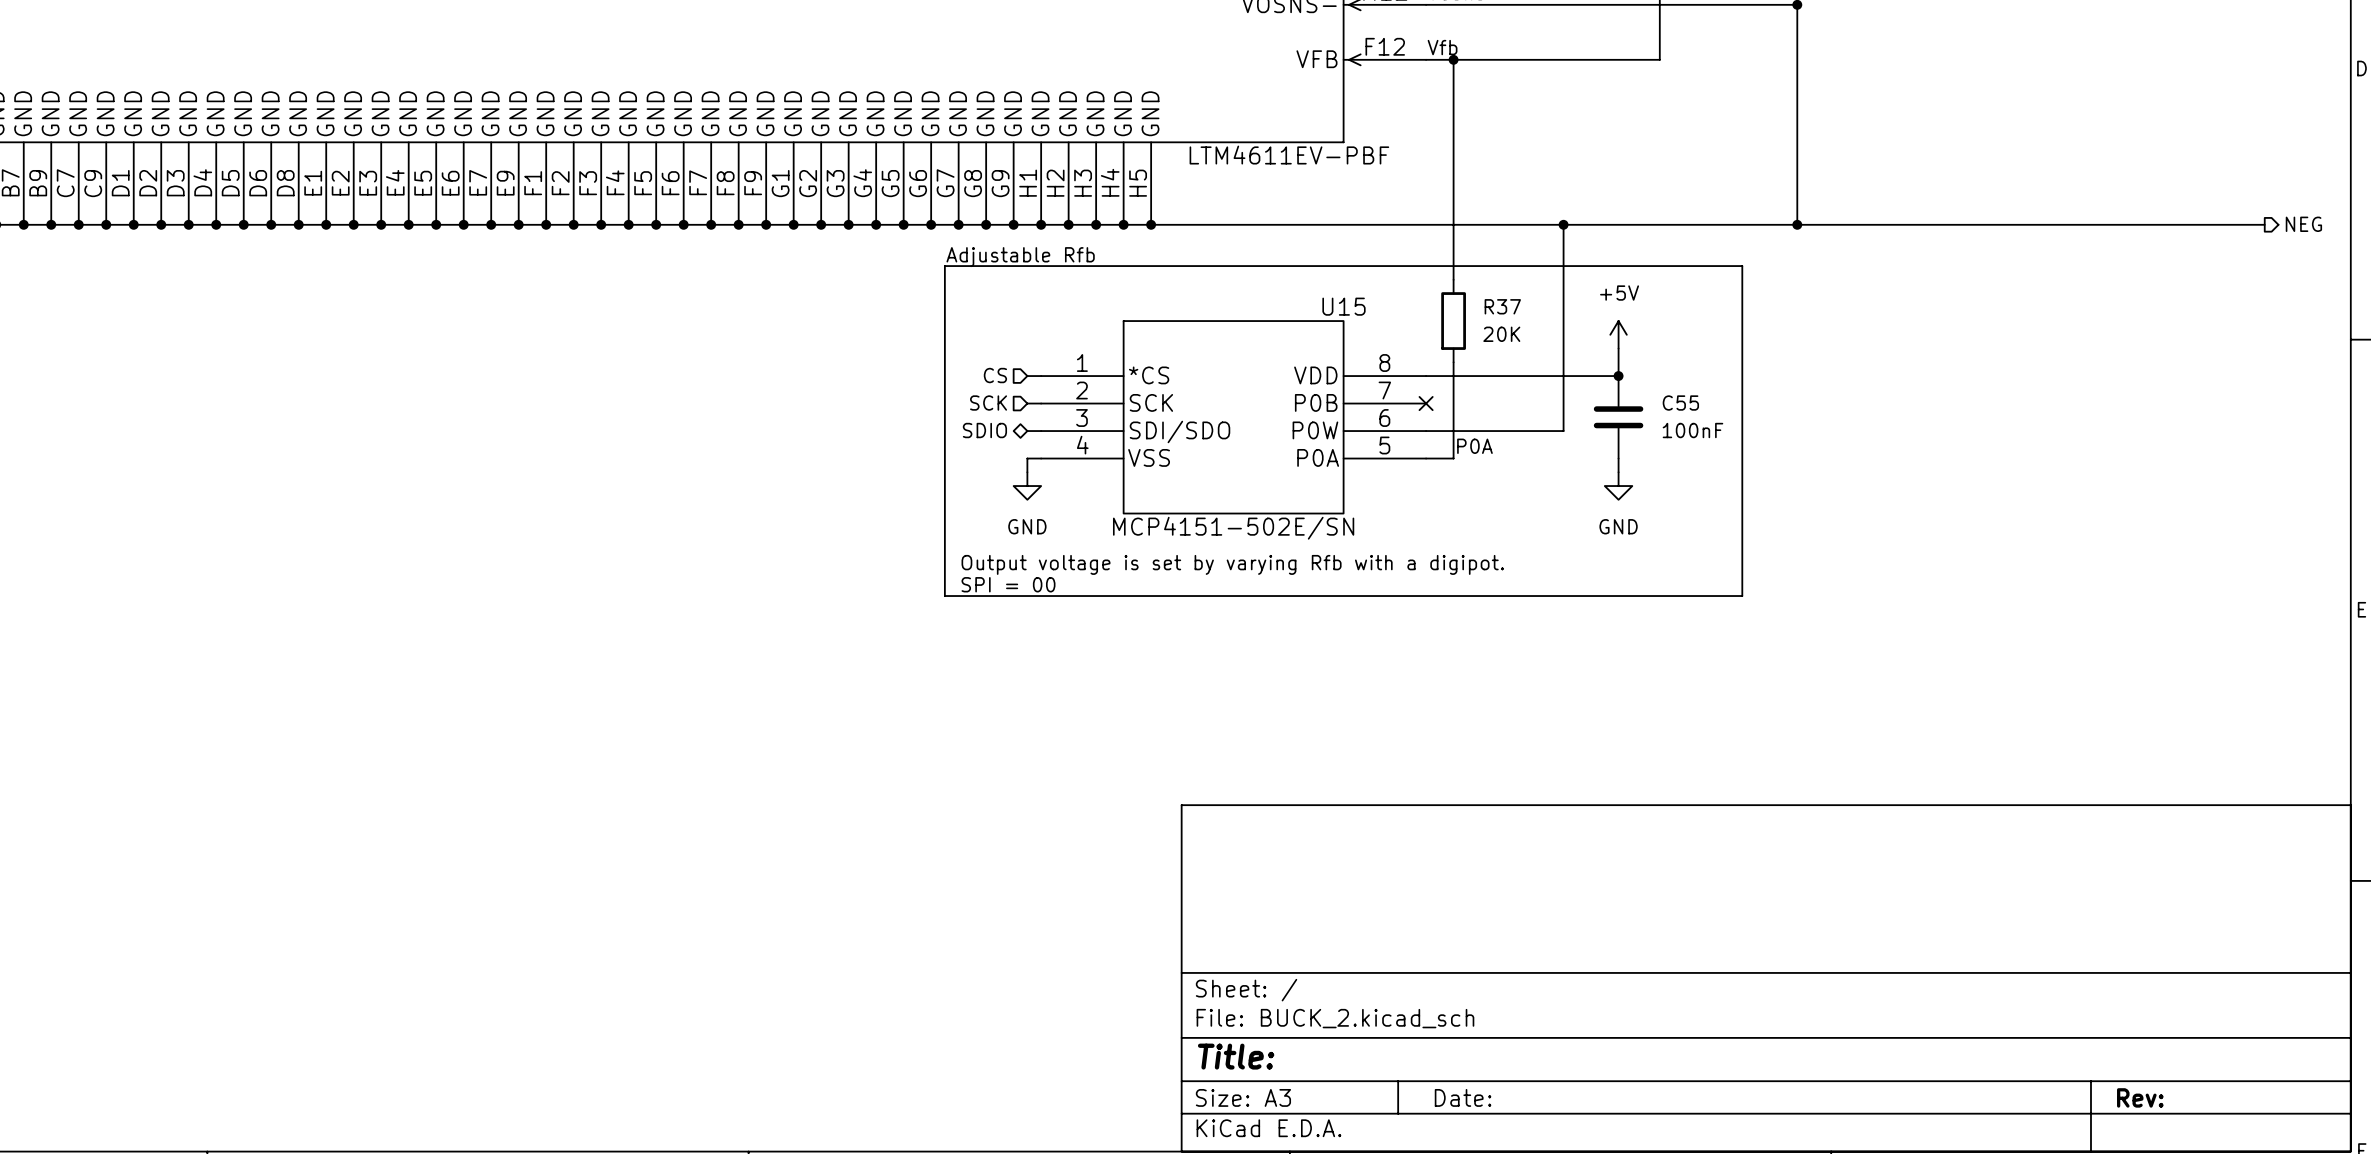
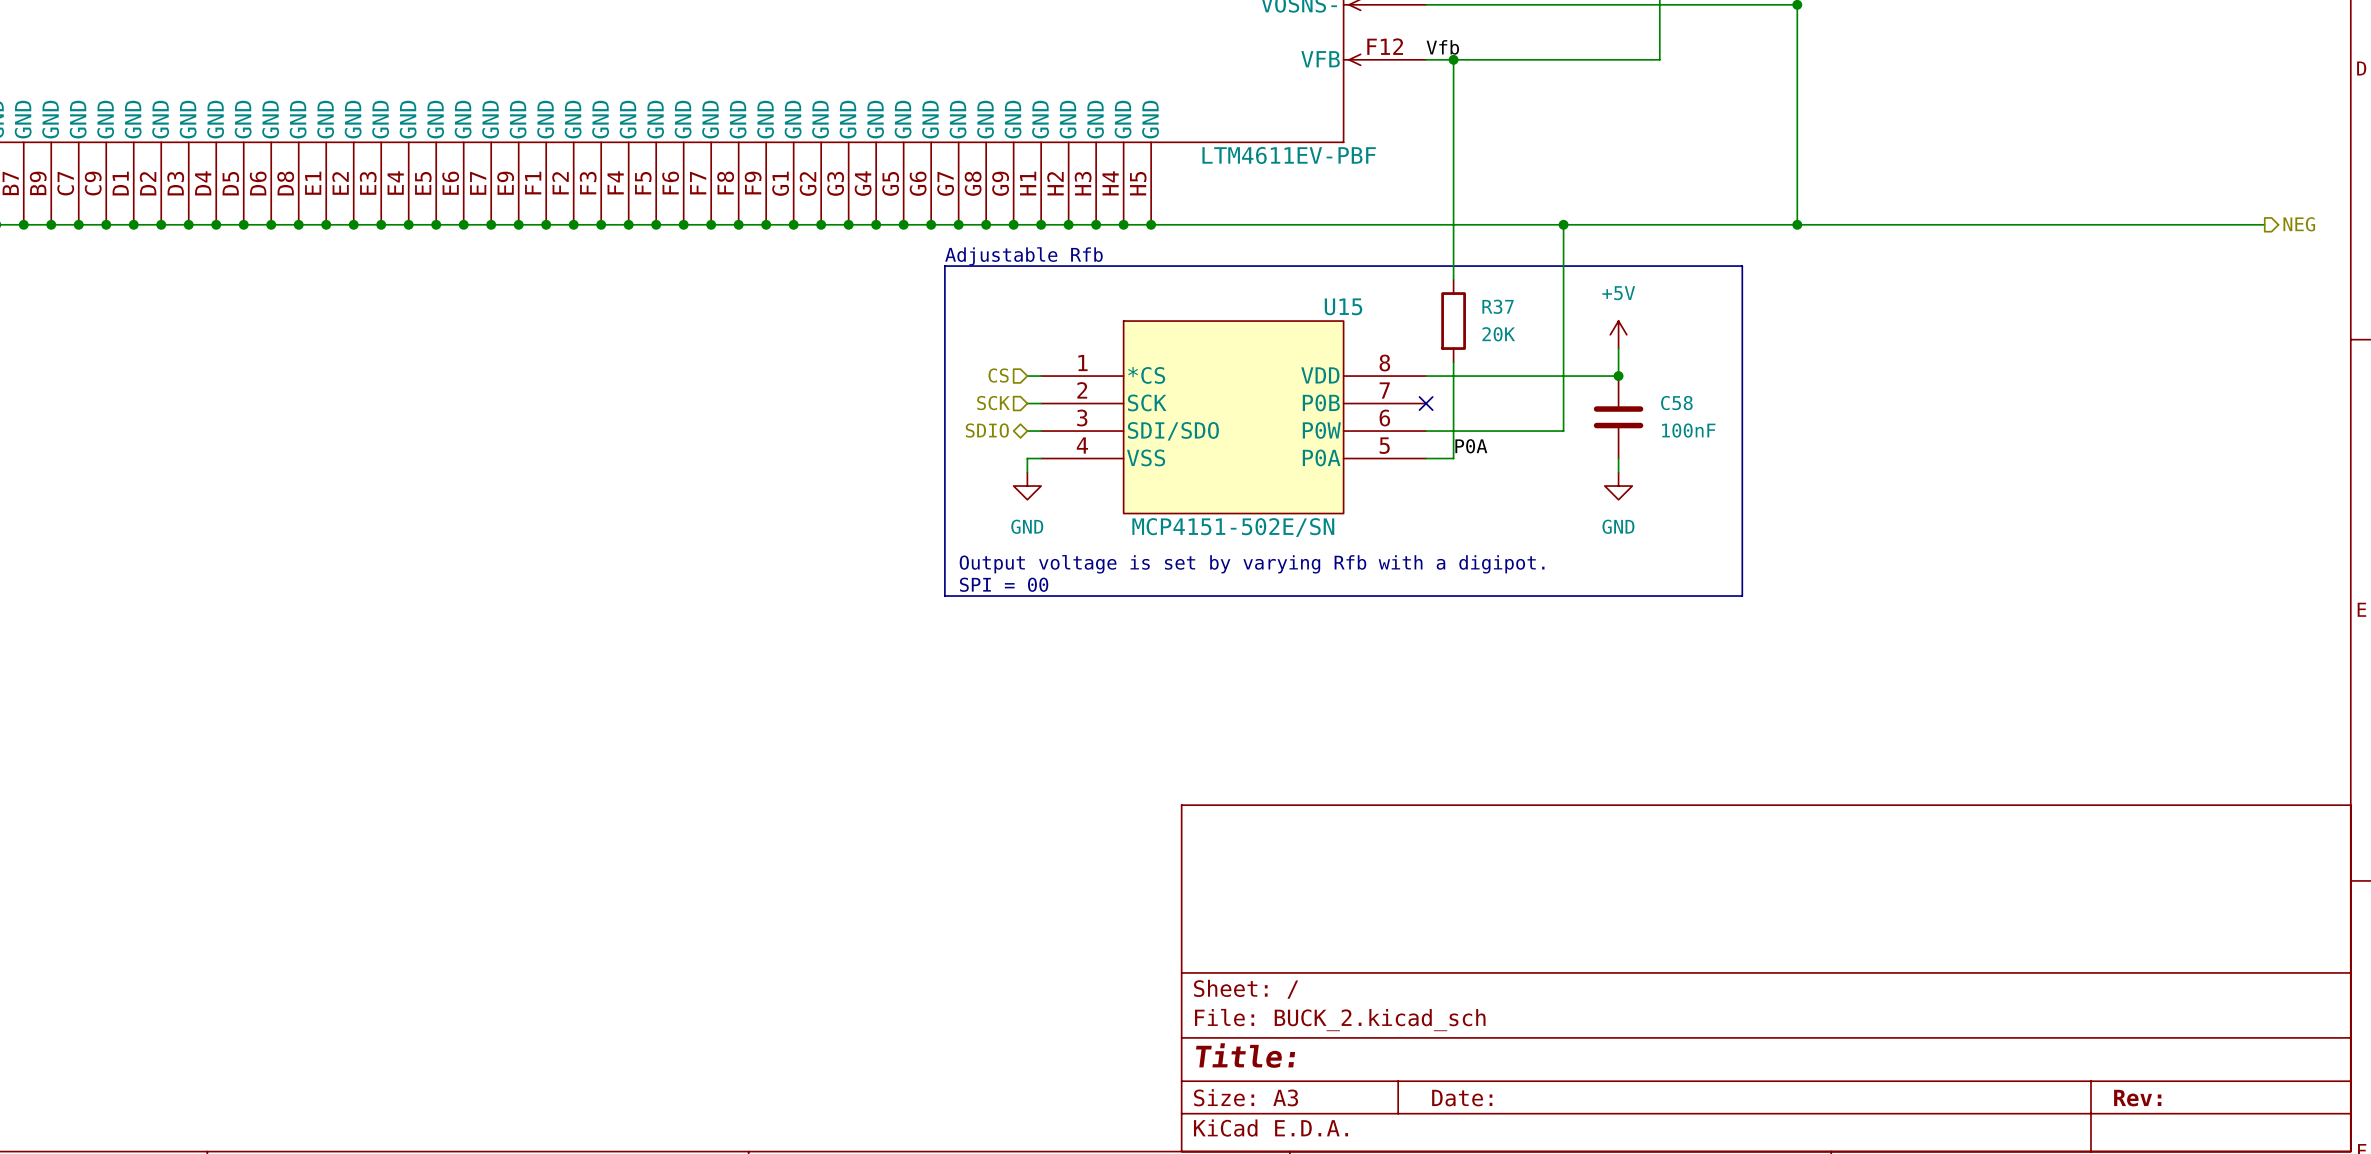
C55 name: C55 (1680, 403) -> C58 (1676, 403)

